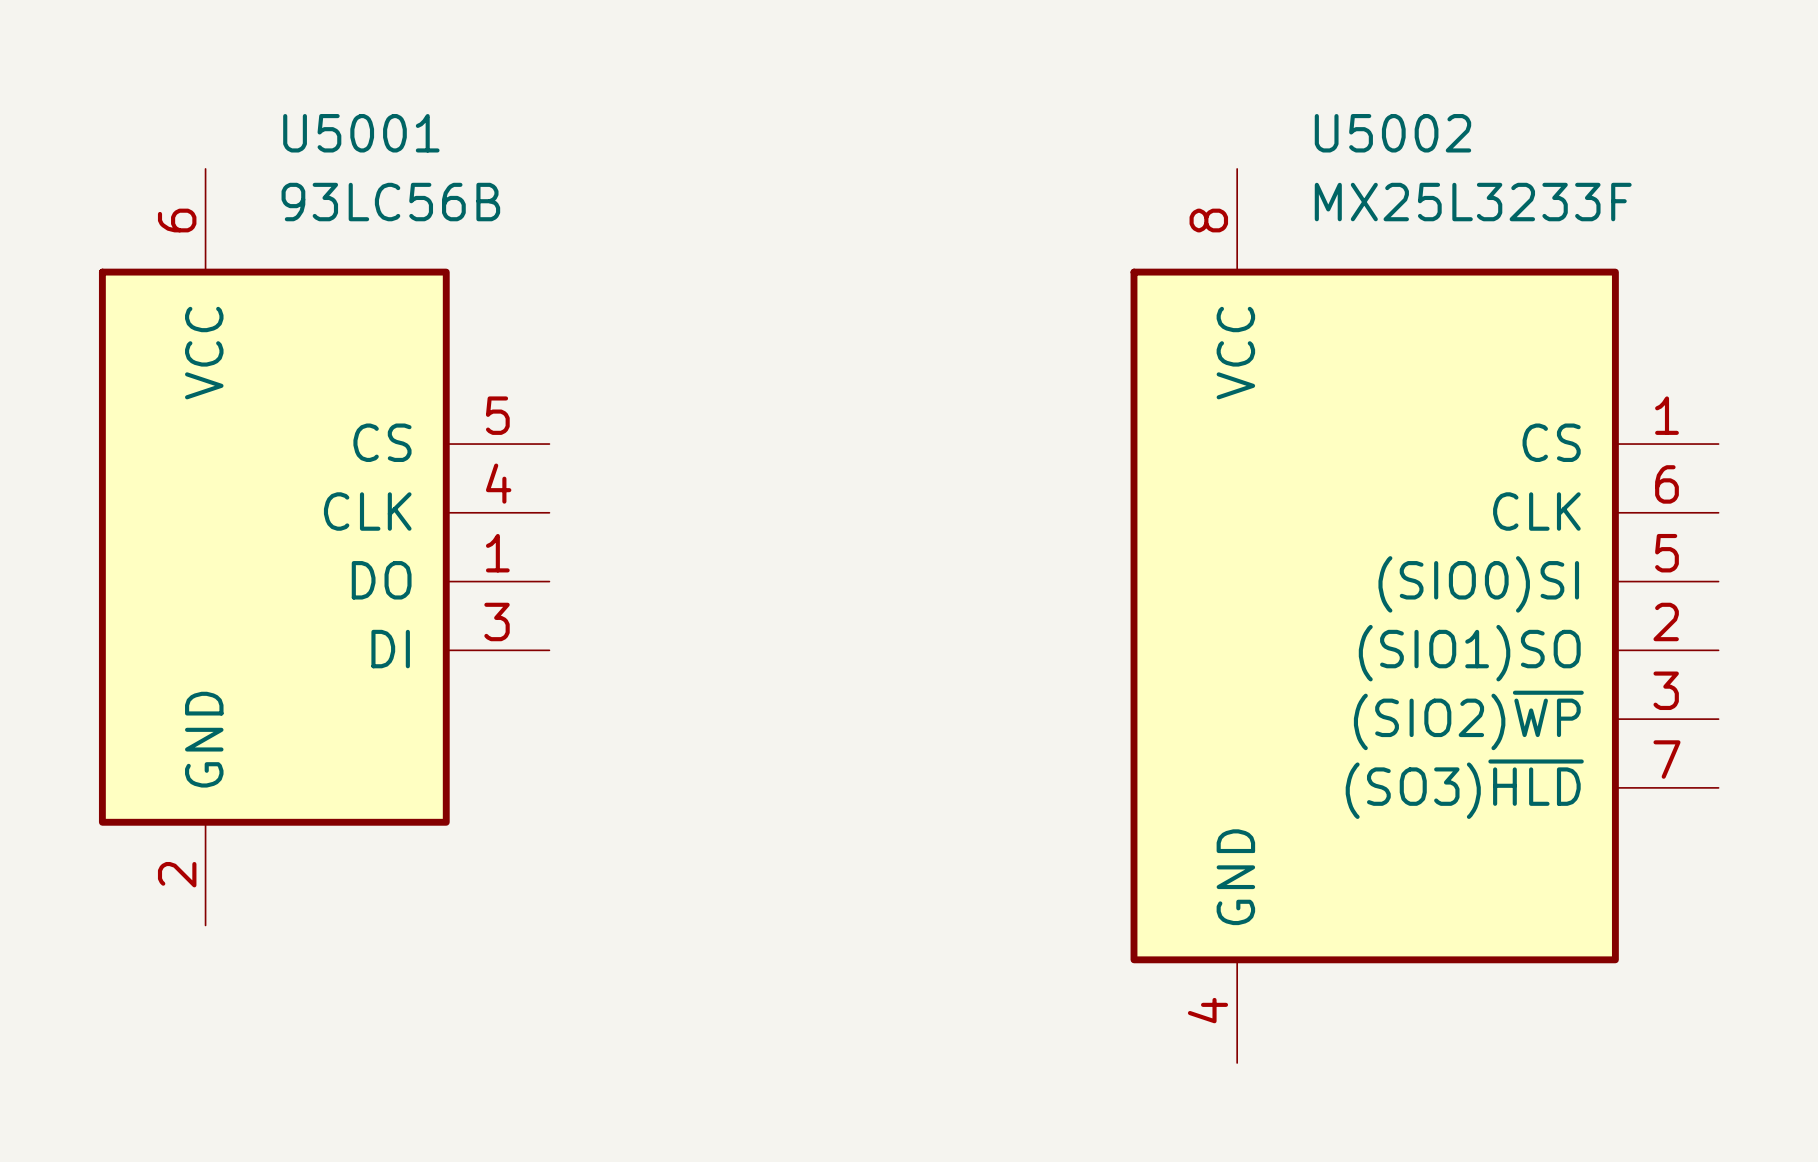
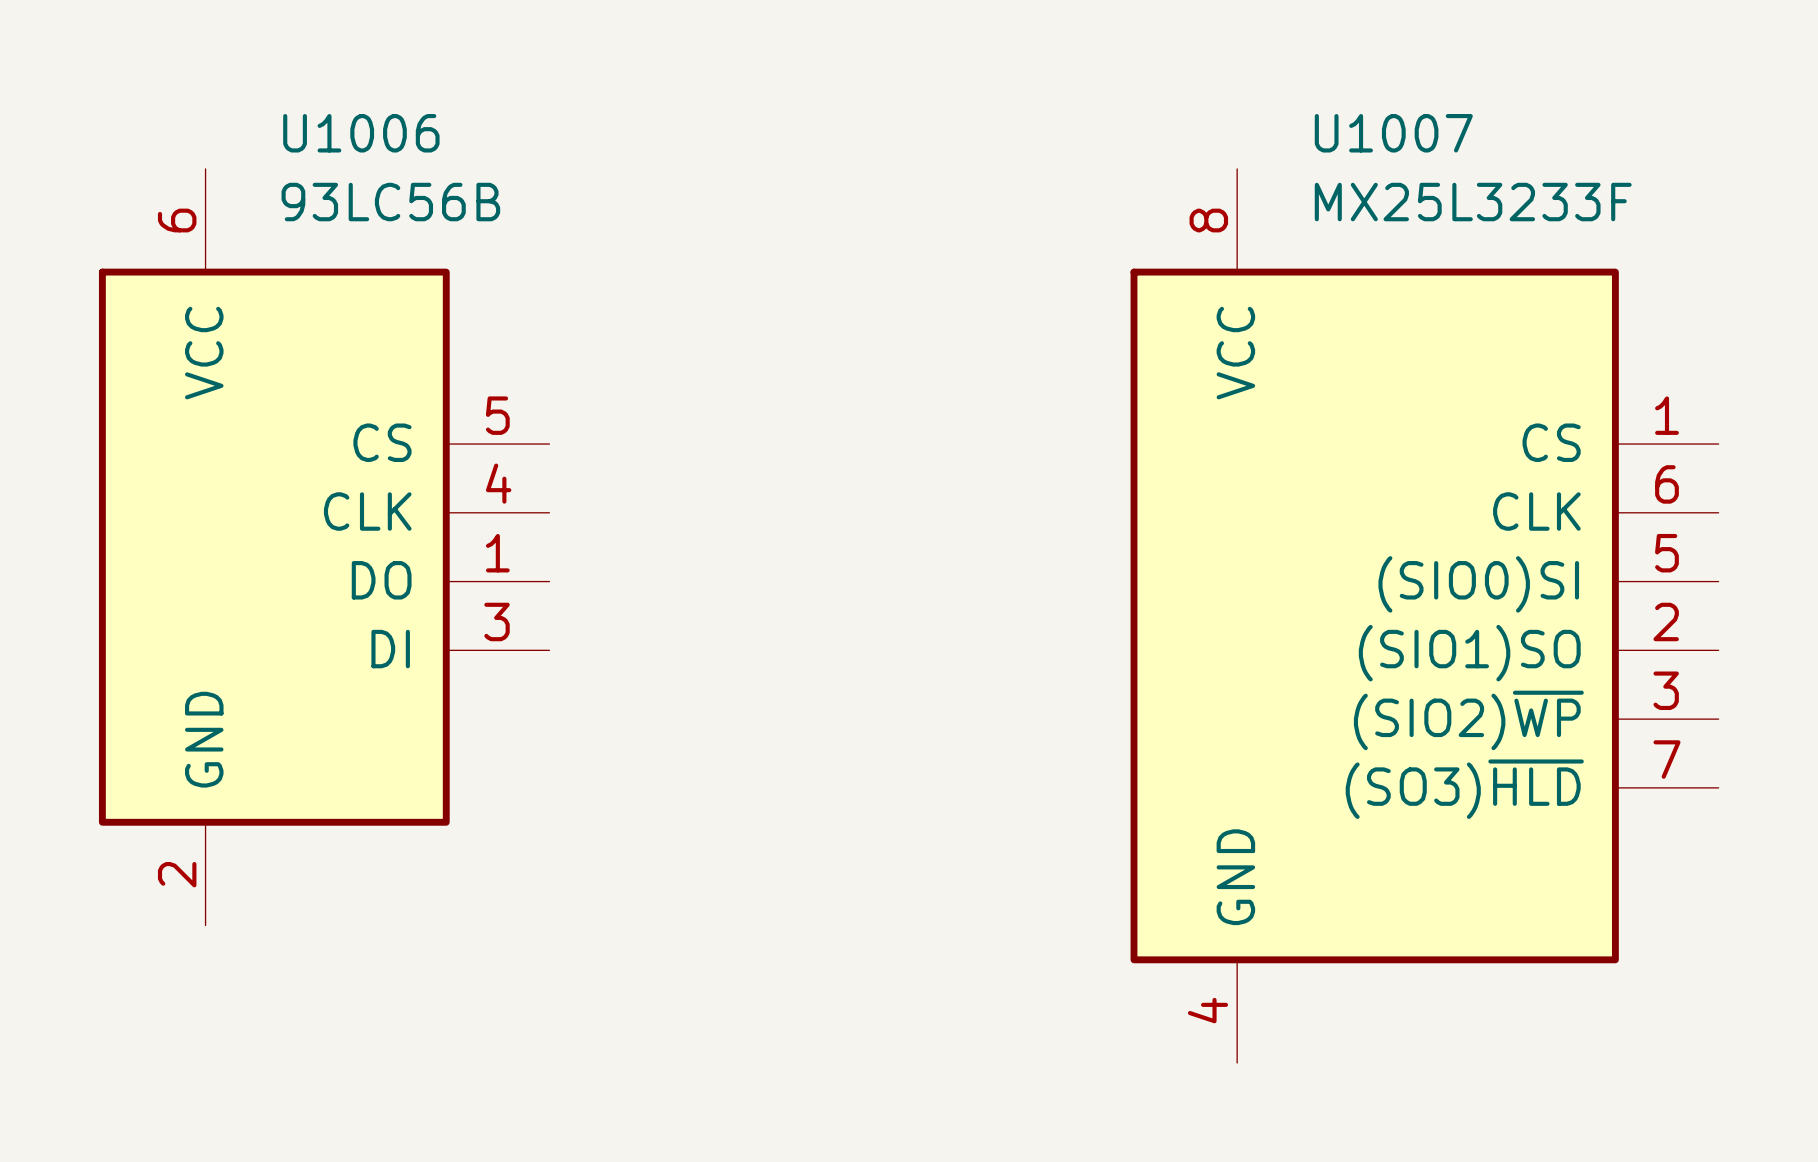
U5001 name: U5001 (361, 133) -> U1006 (361, 133)
U5002 name: U5002 (1392, 133) -> U1007 (1393, 133)

